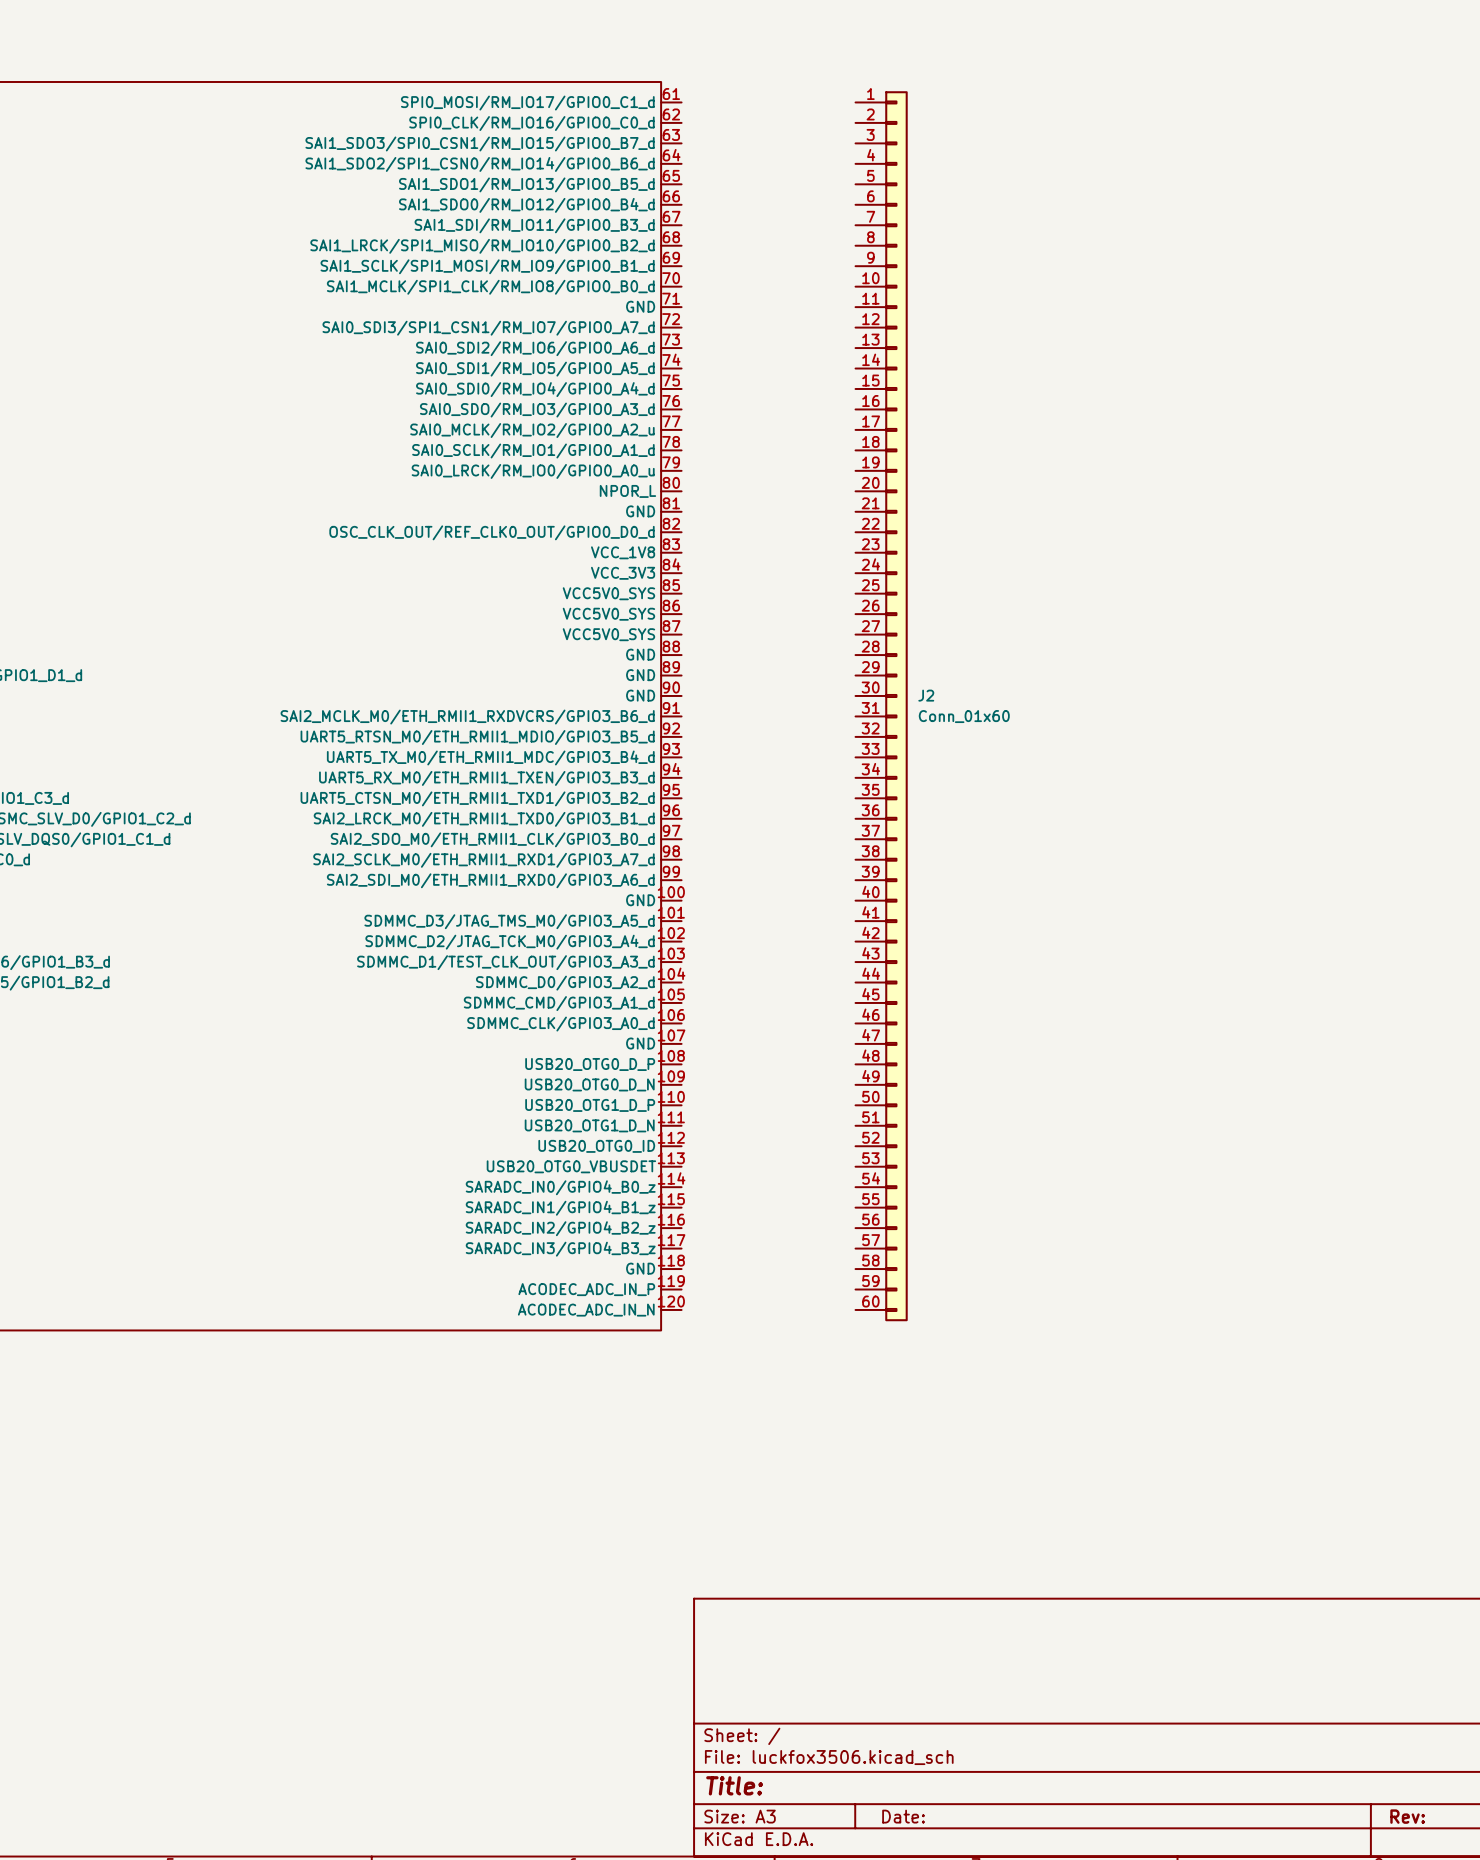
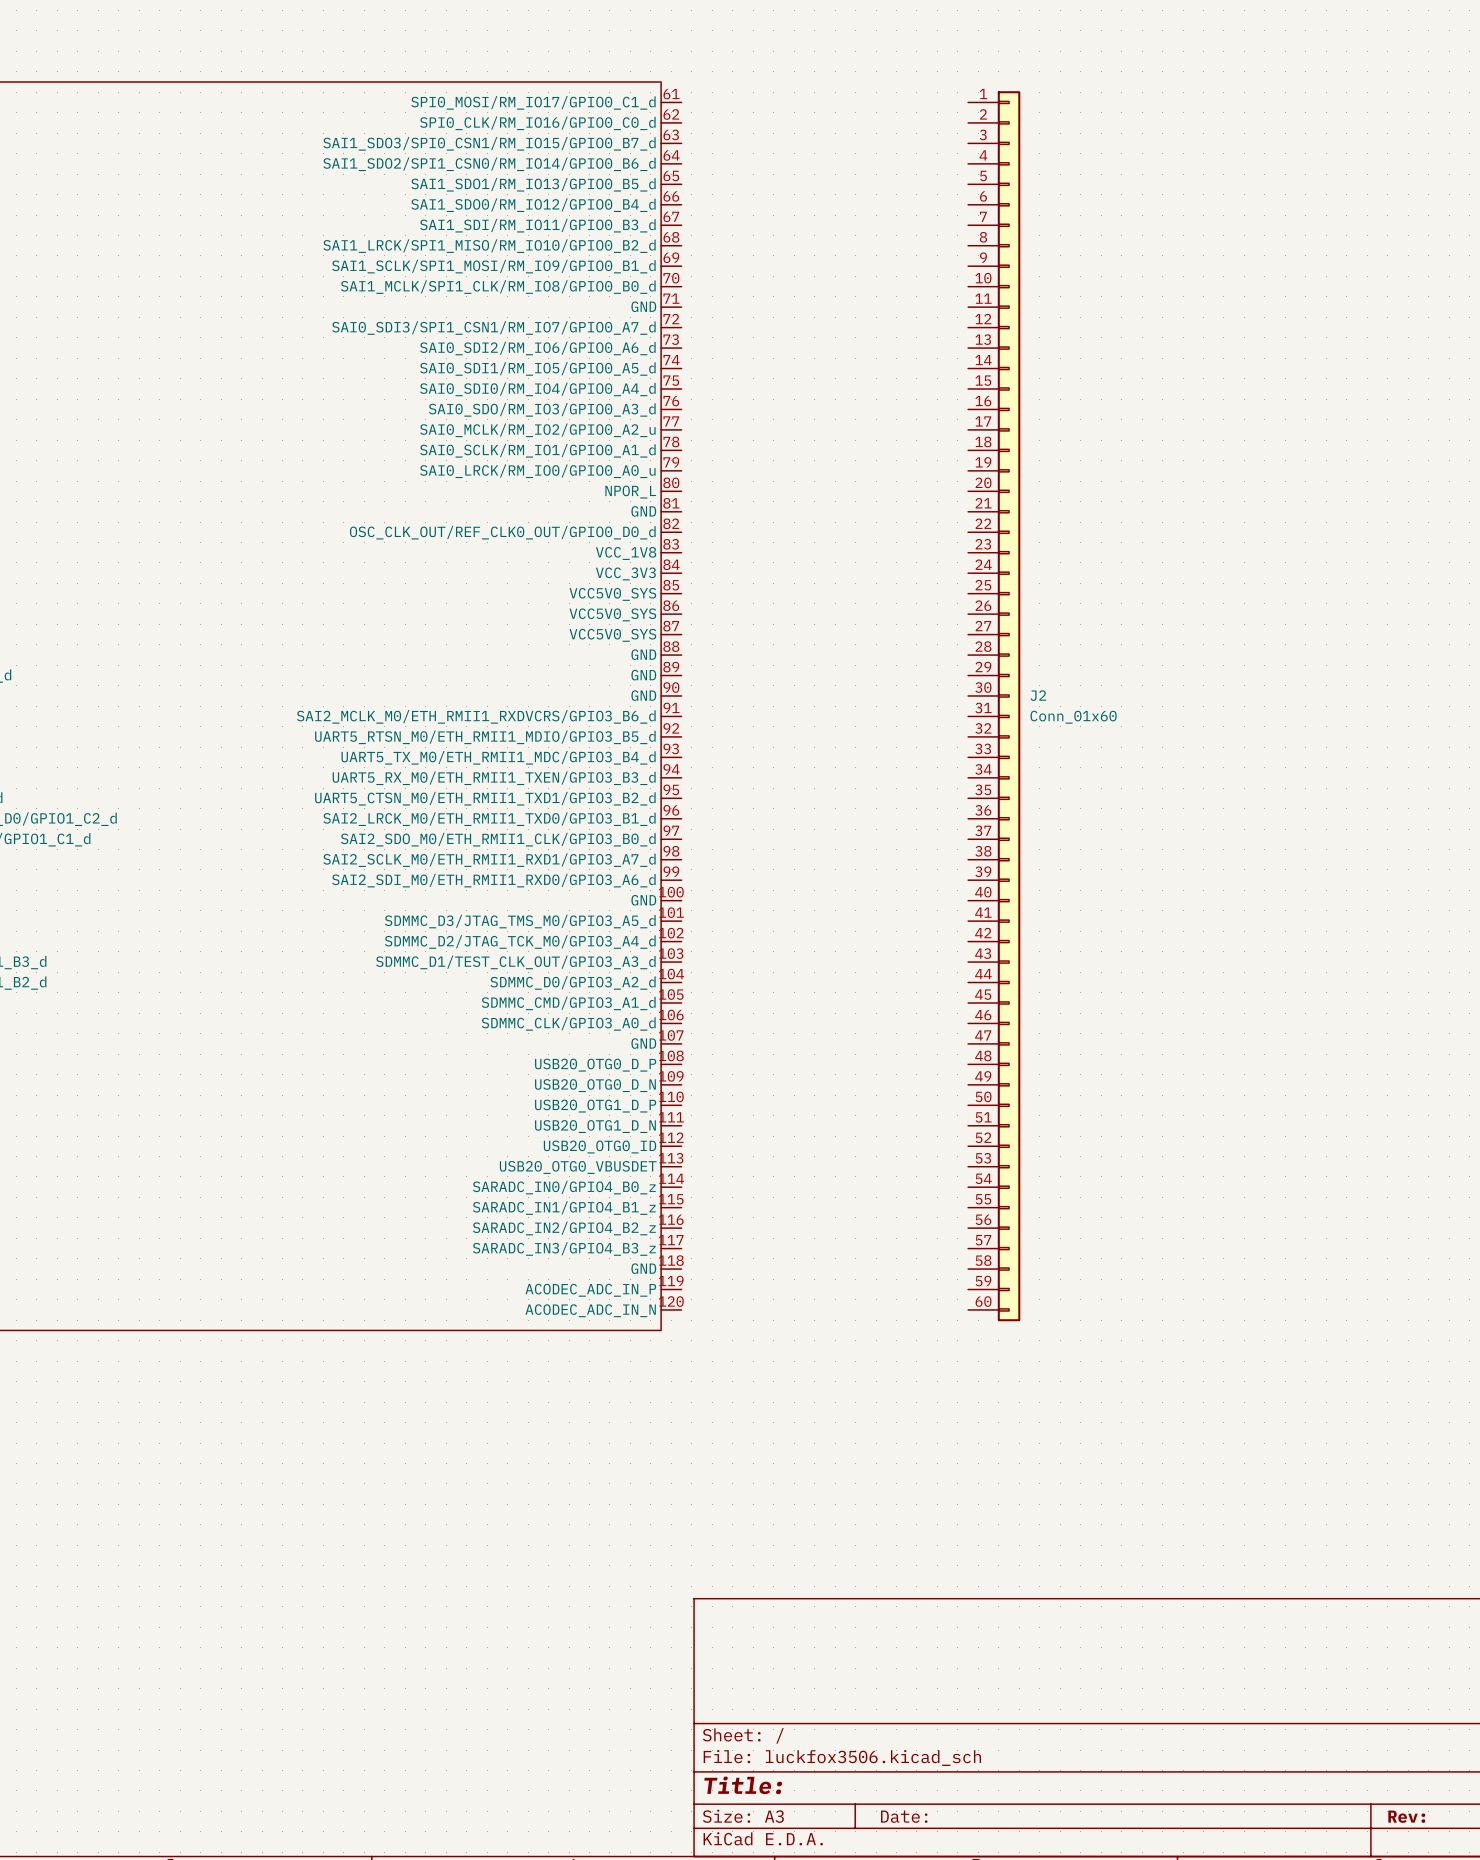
J2 position: (881, 706) -> (994, 706)

